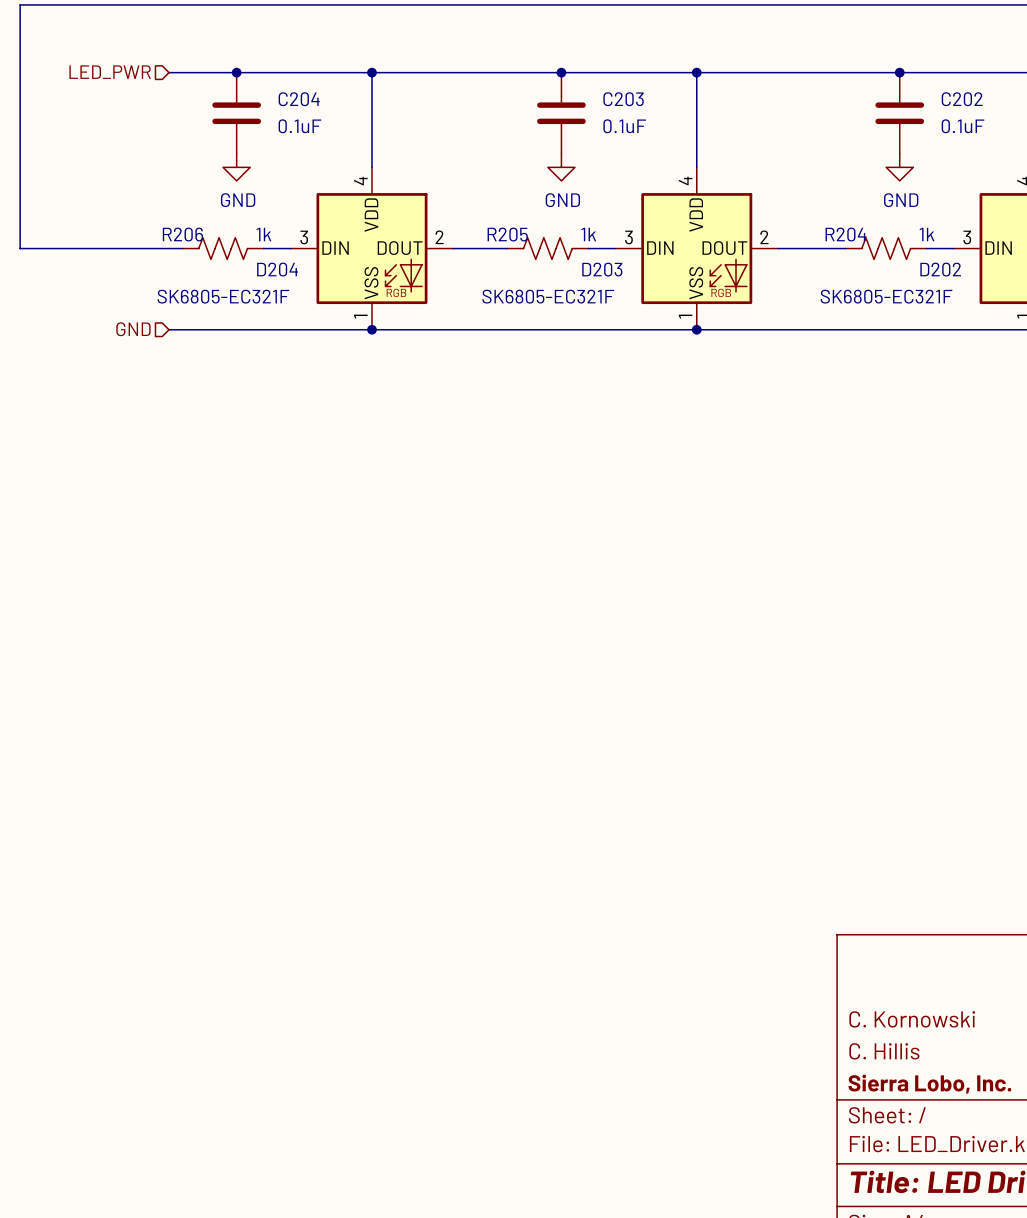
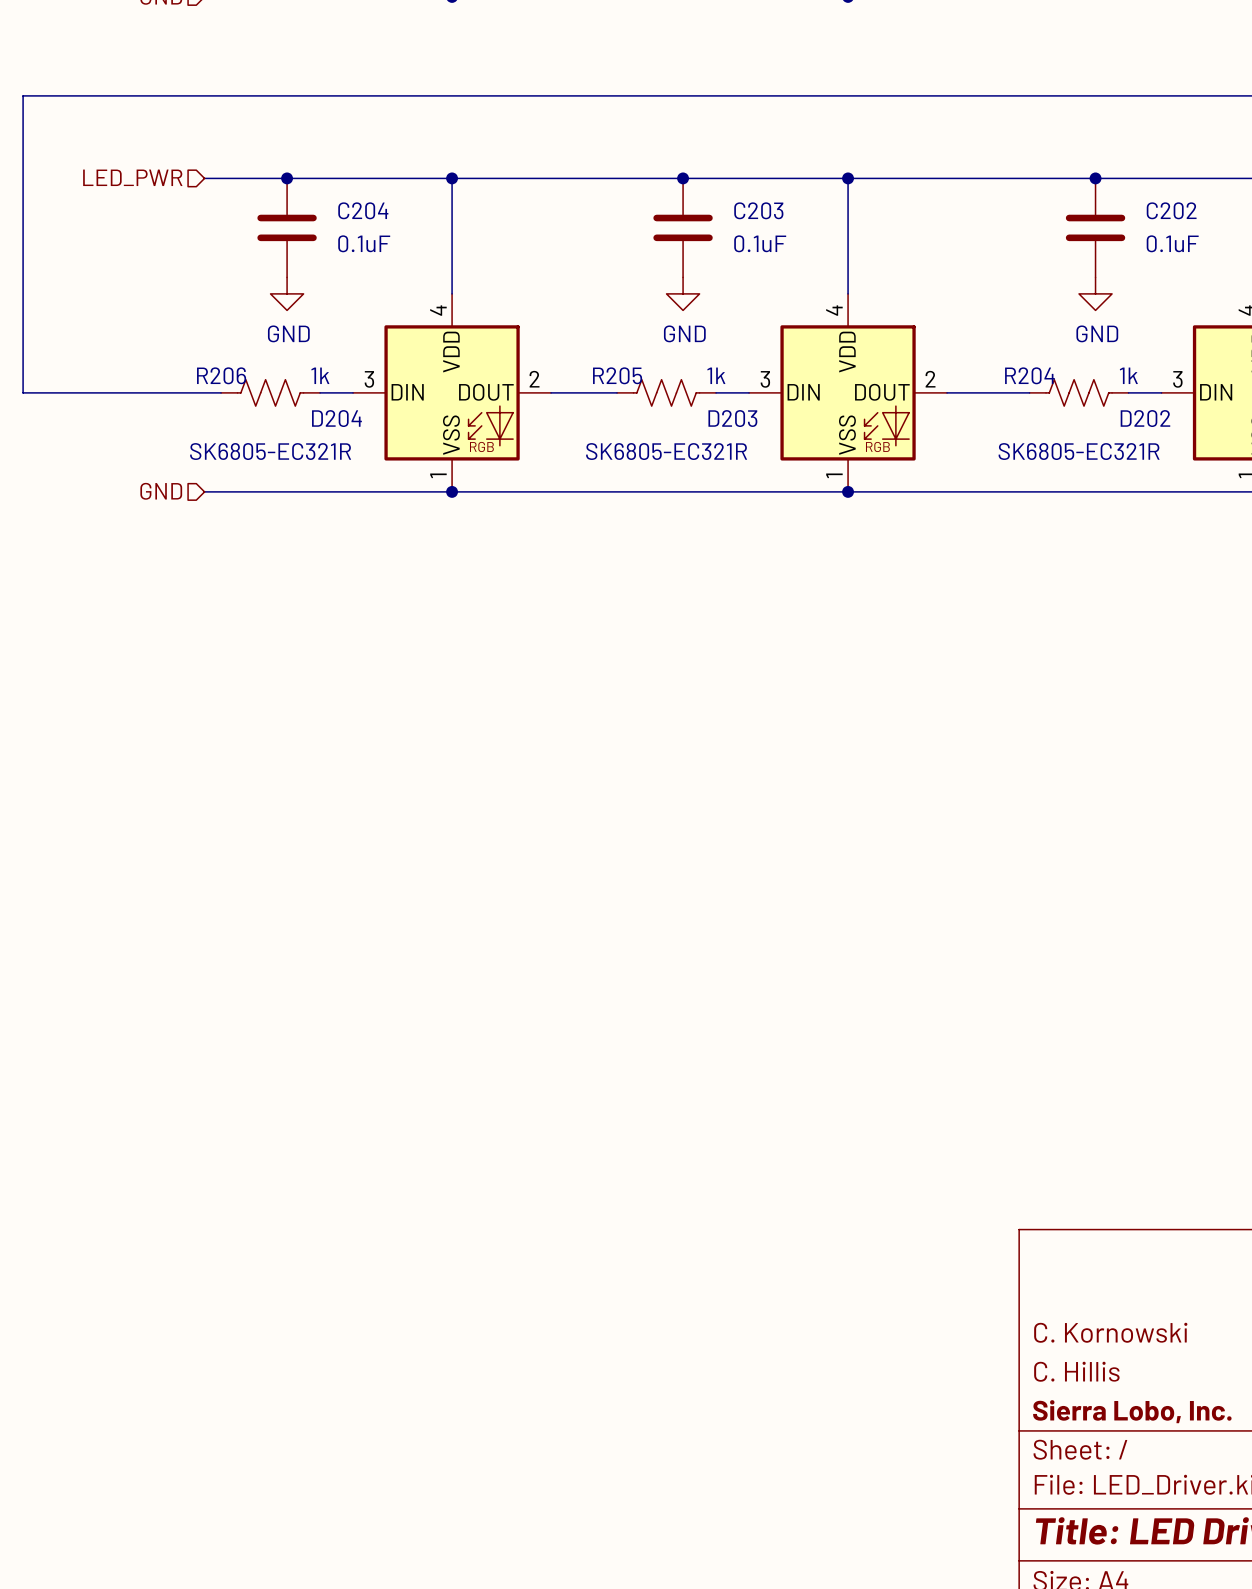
D204 value: SK6805-EC321F (223, 296) -> SK6805-EC321R (270, 451)
D203 value: SK6805-EC321F (548, 296) -> SK6805-EC321R (666, 451)
D202 value: SK6805-EC321F (886, 296) -> SK6805-EC321R (1079, 451)

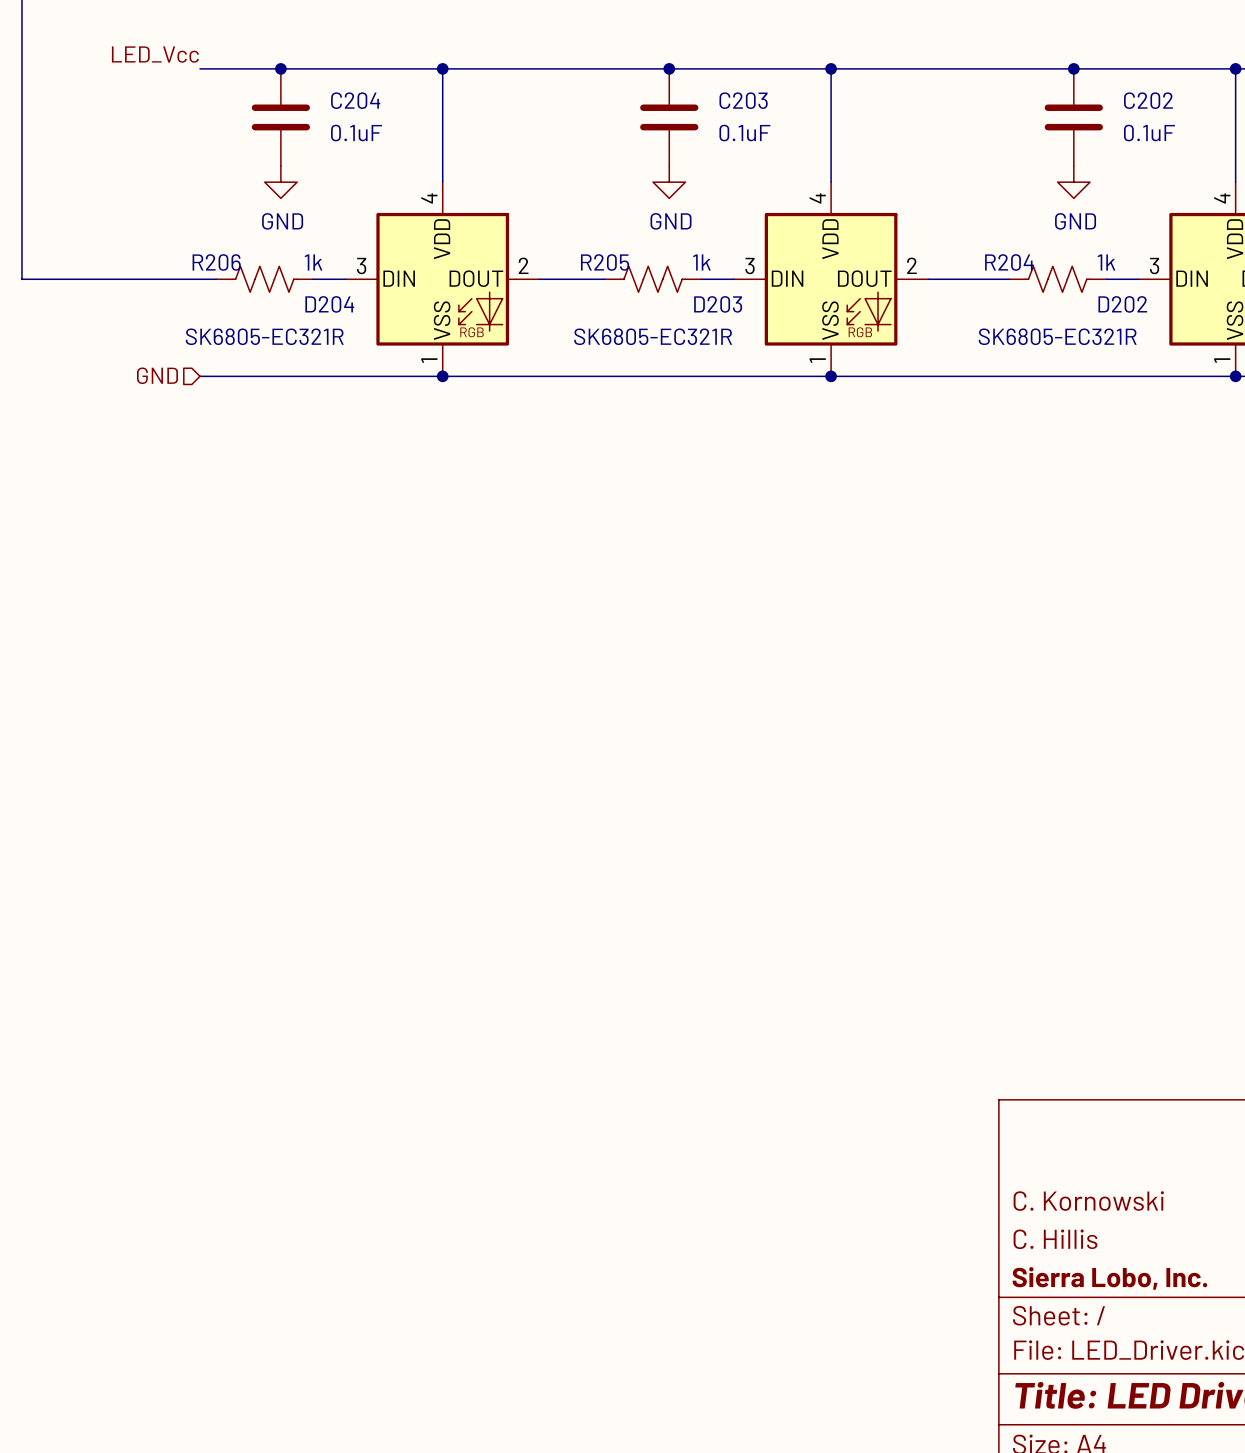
label: none -> LED_Vcc (155, 54)
hierarchical label: LED_PWR (132, 177) -> none

